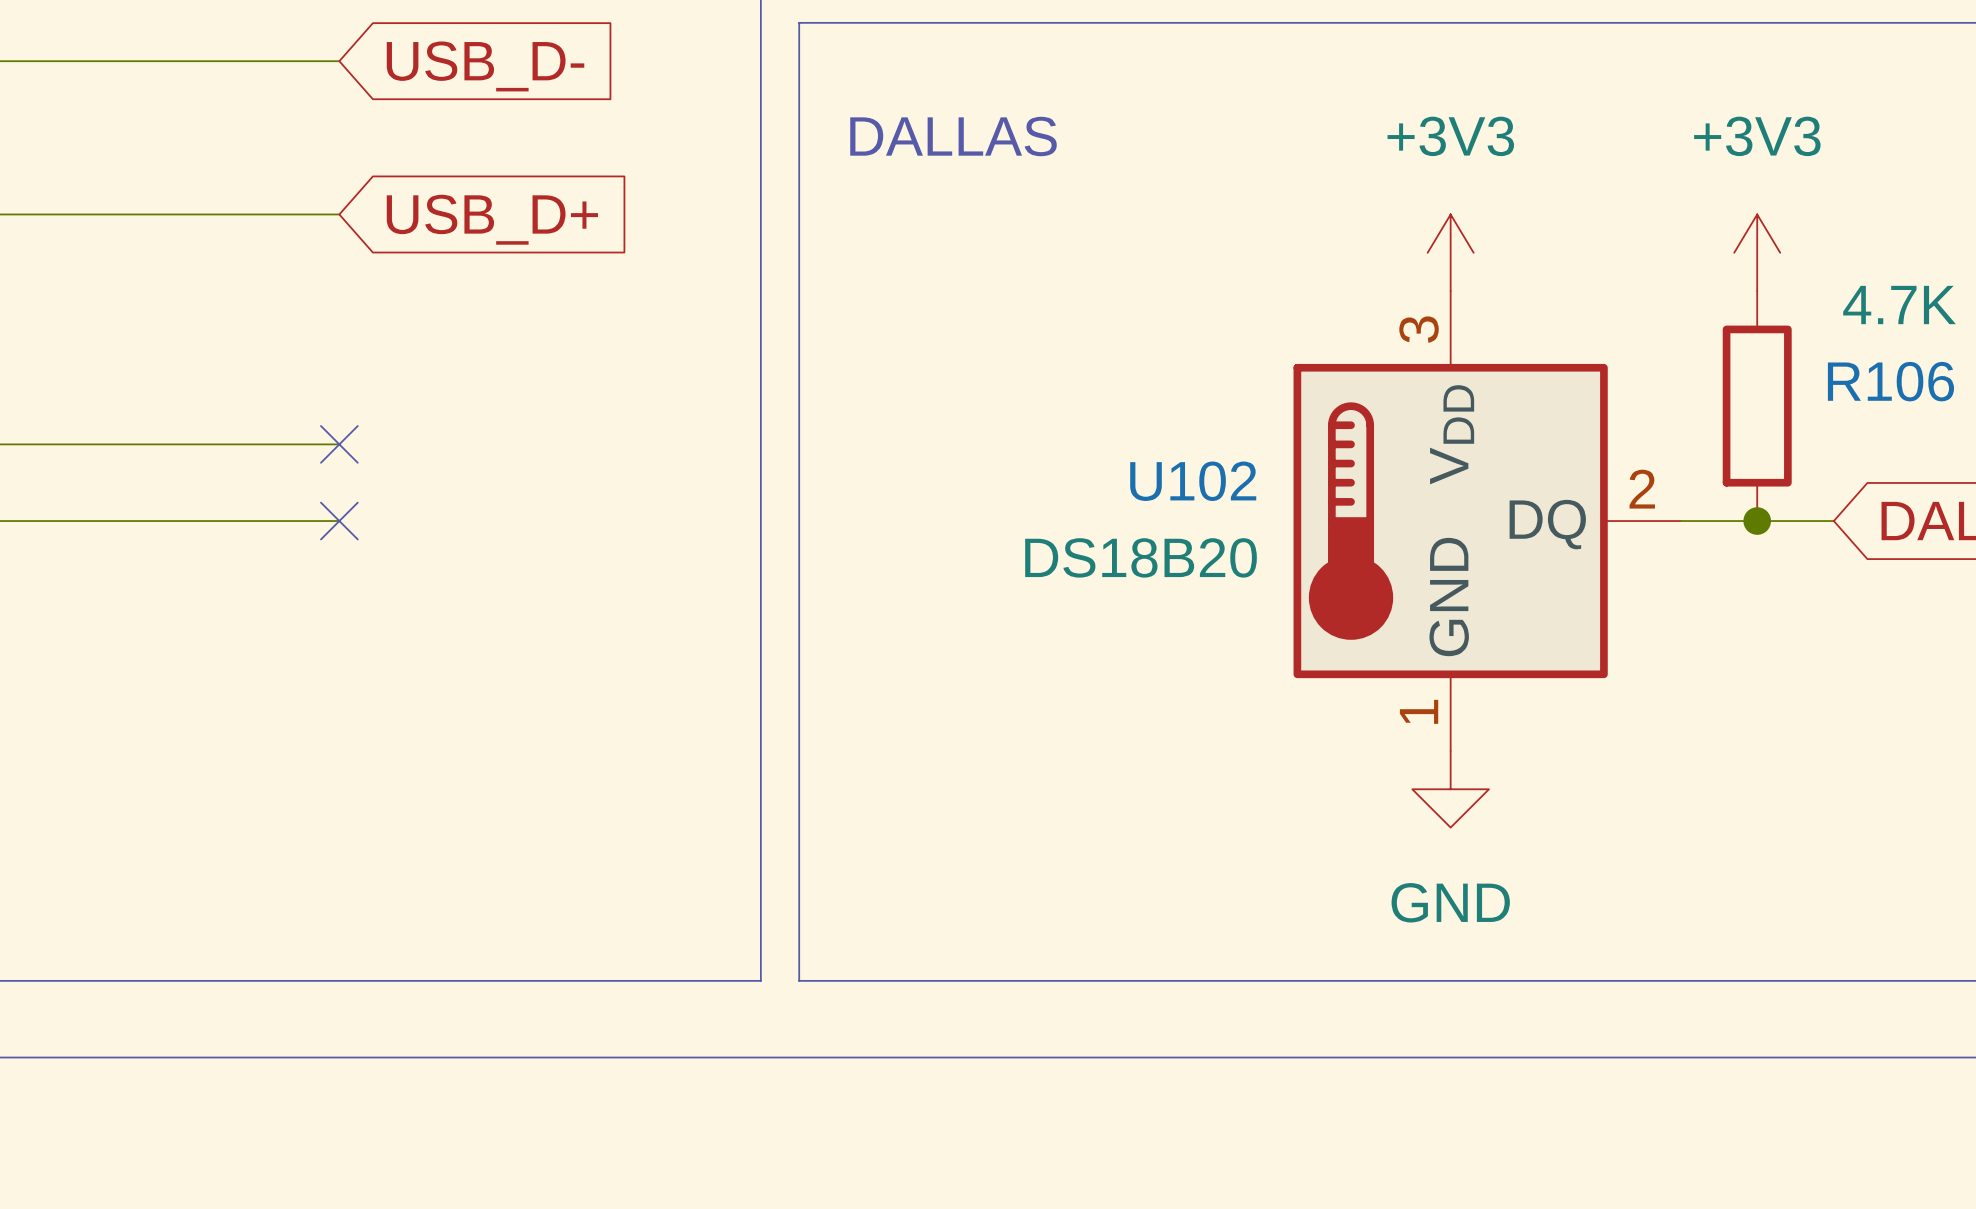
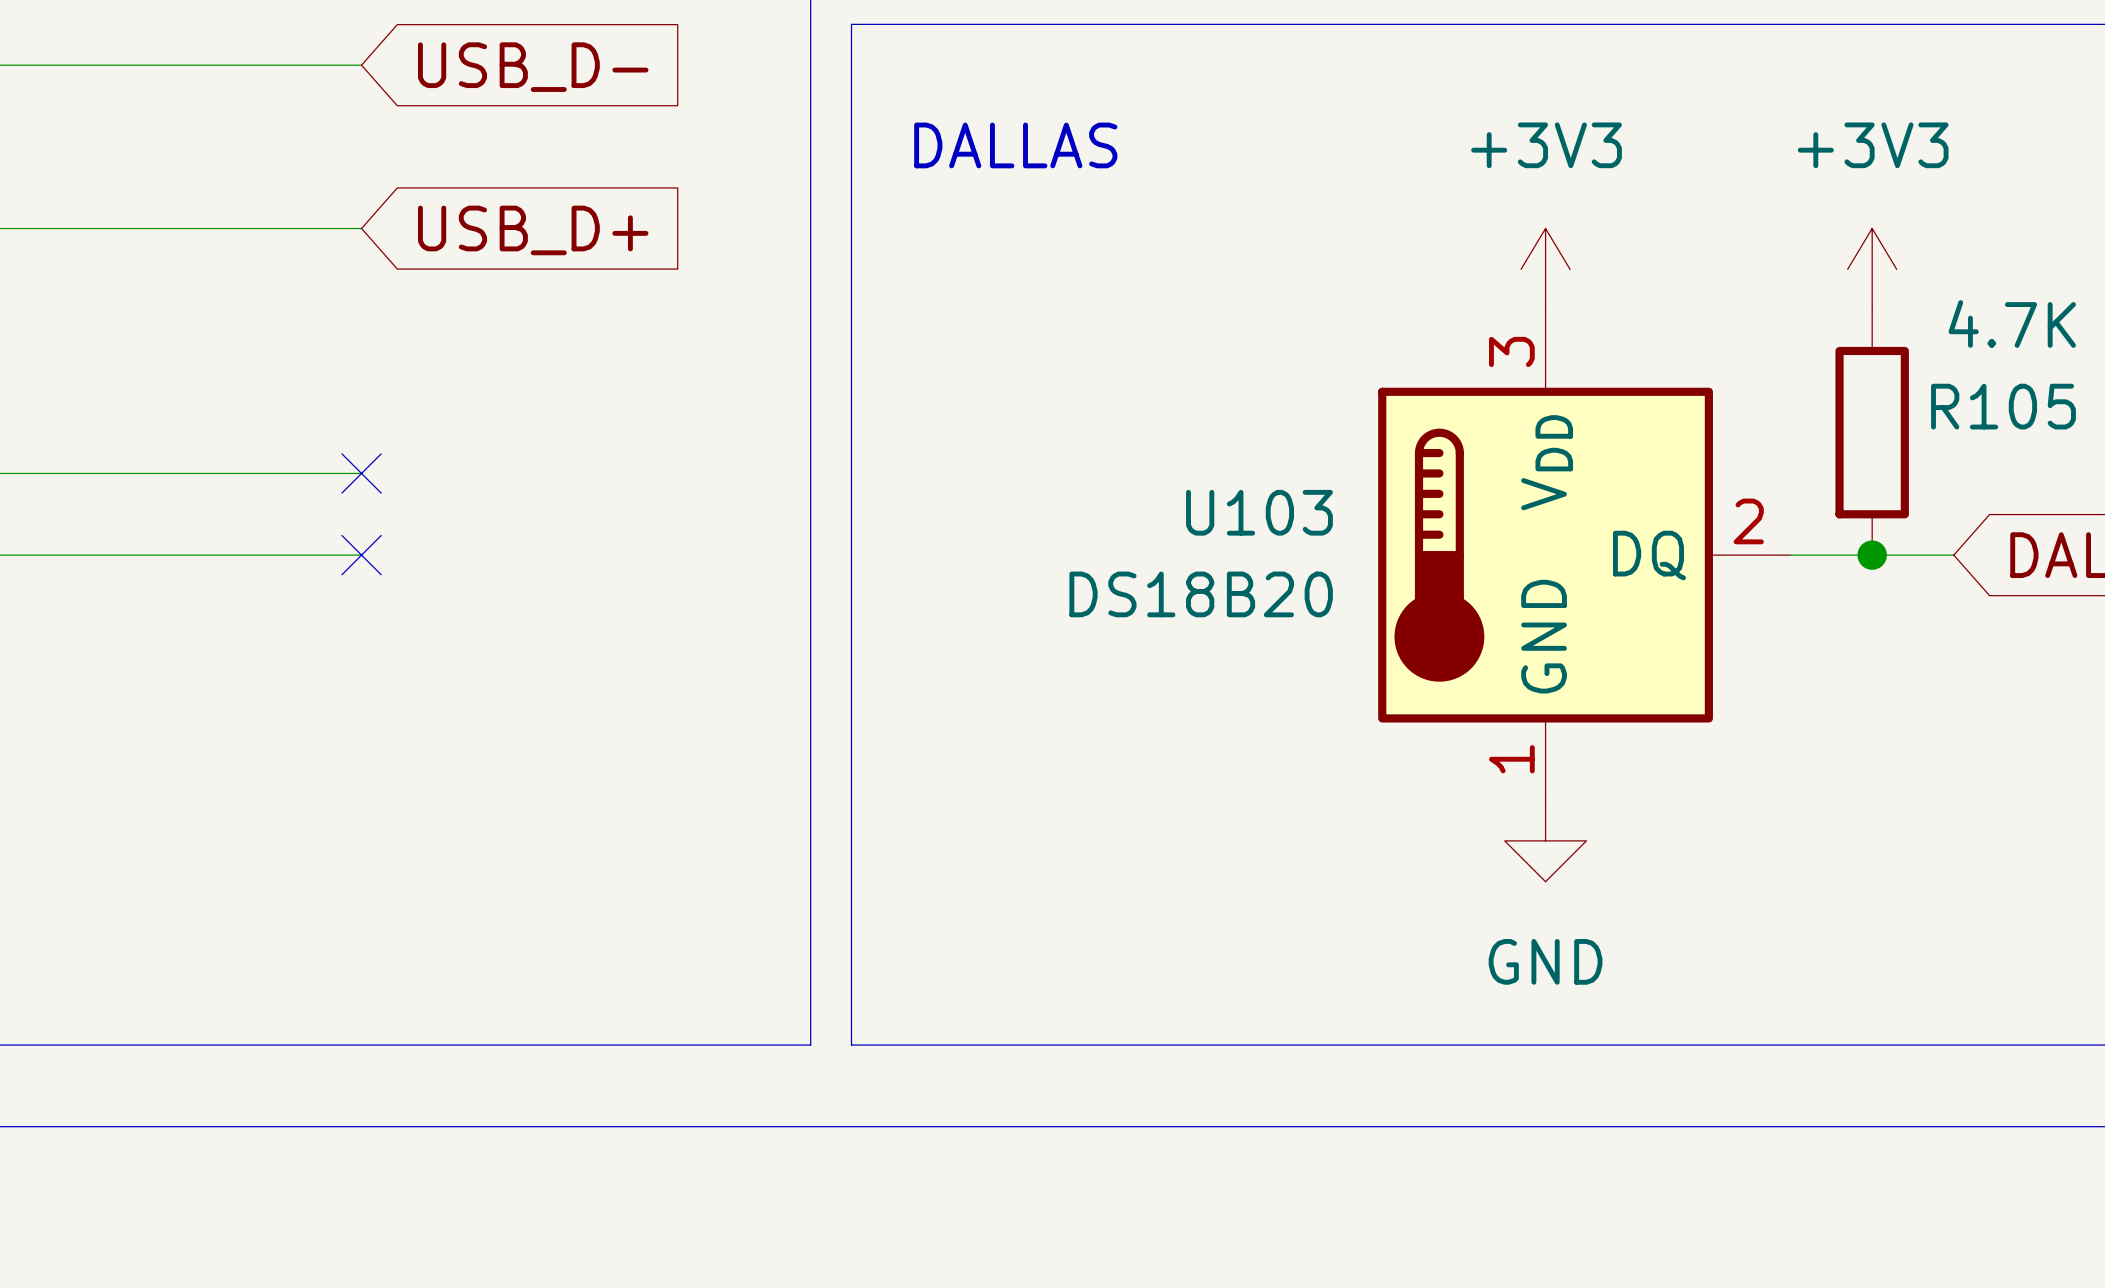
R106 name: R106 (1890, 381) -> R105 (2003, 406)
U102 name: U102 (1193, 481) -> U103 (1259, 512)

